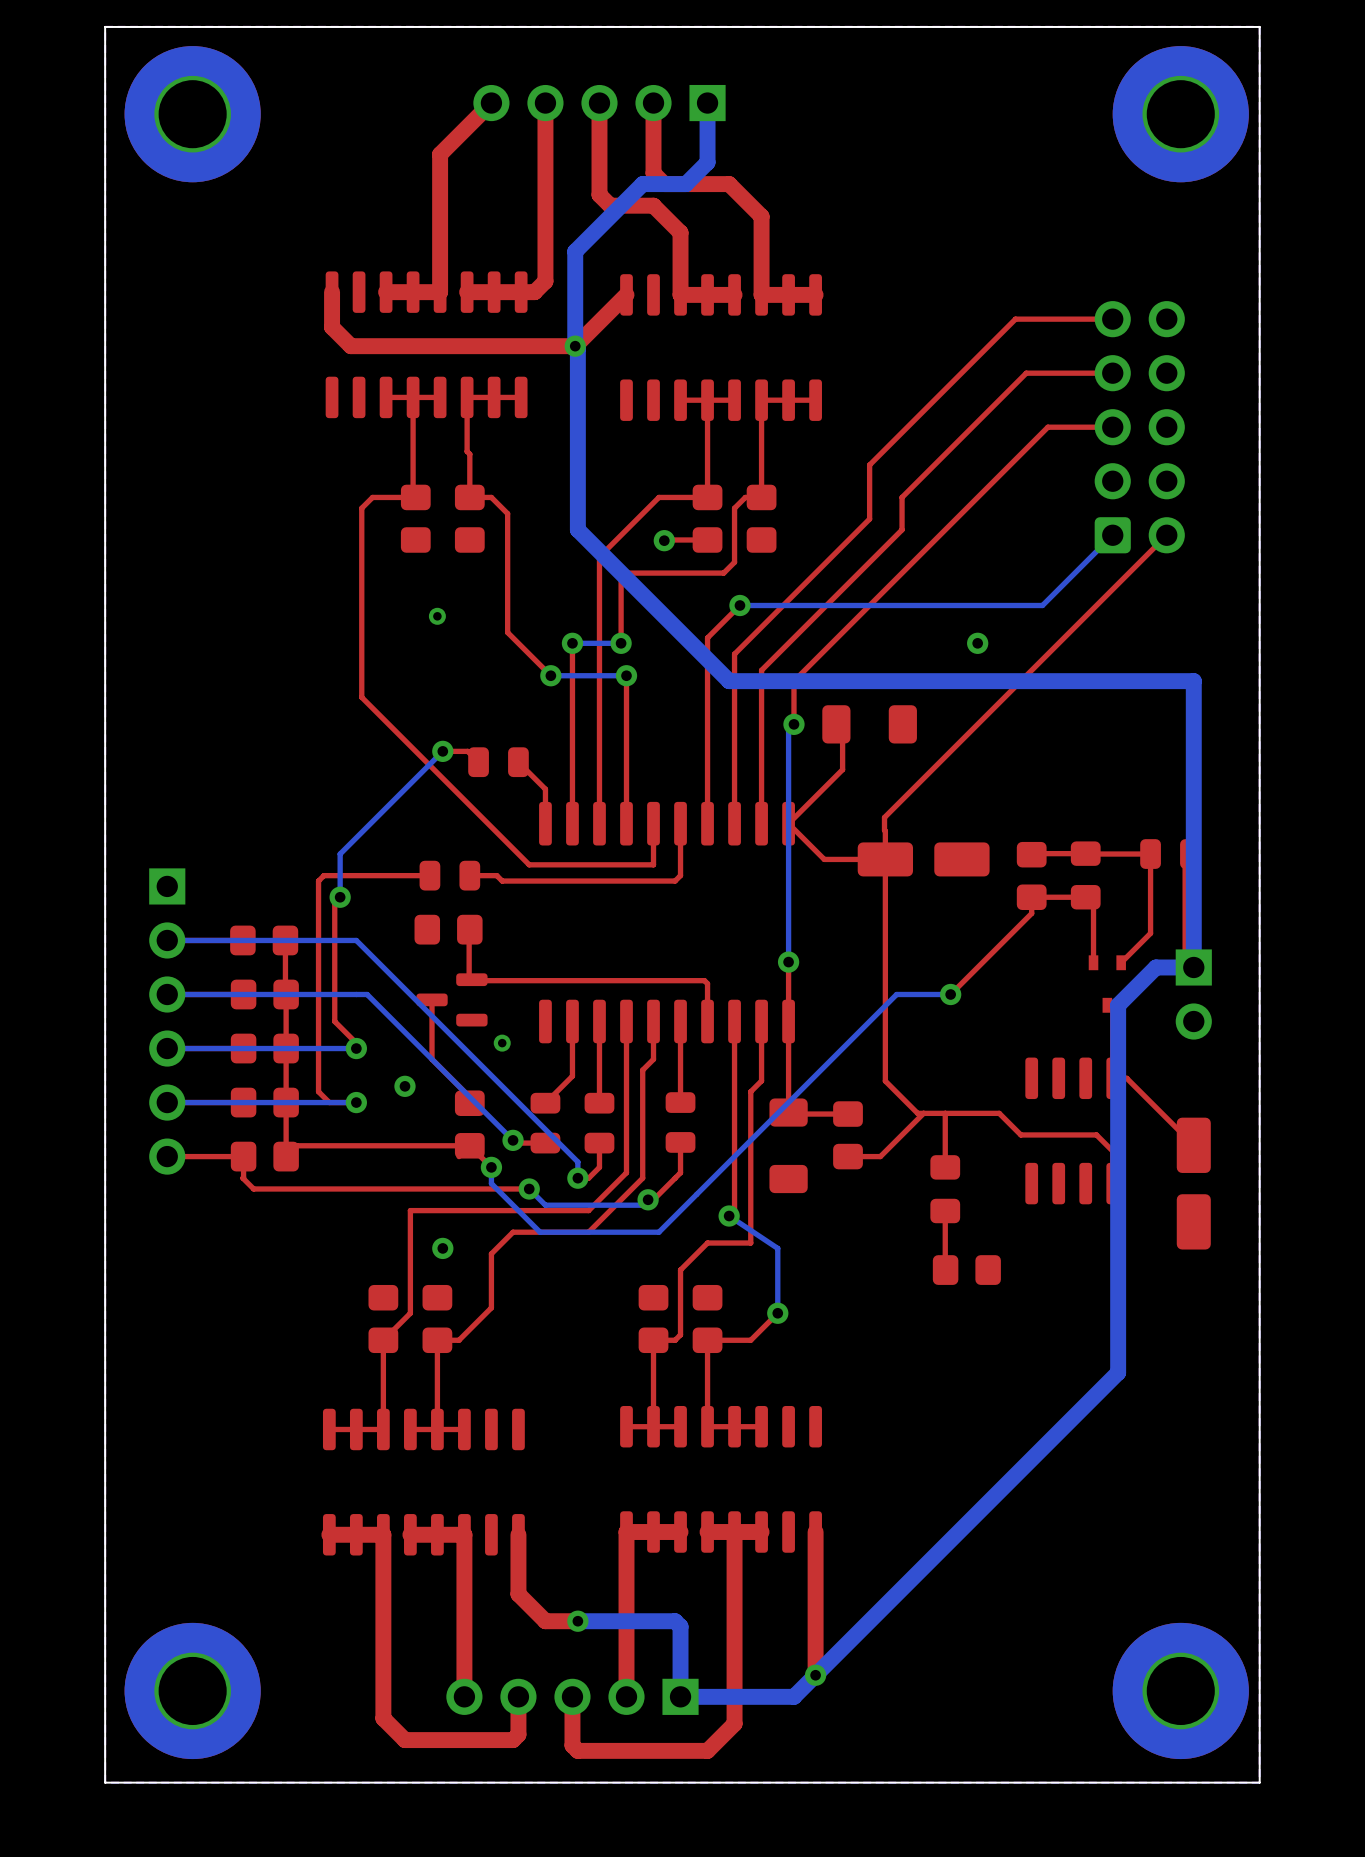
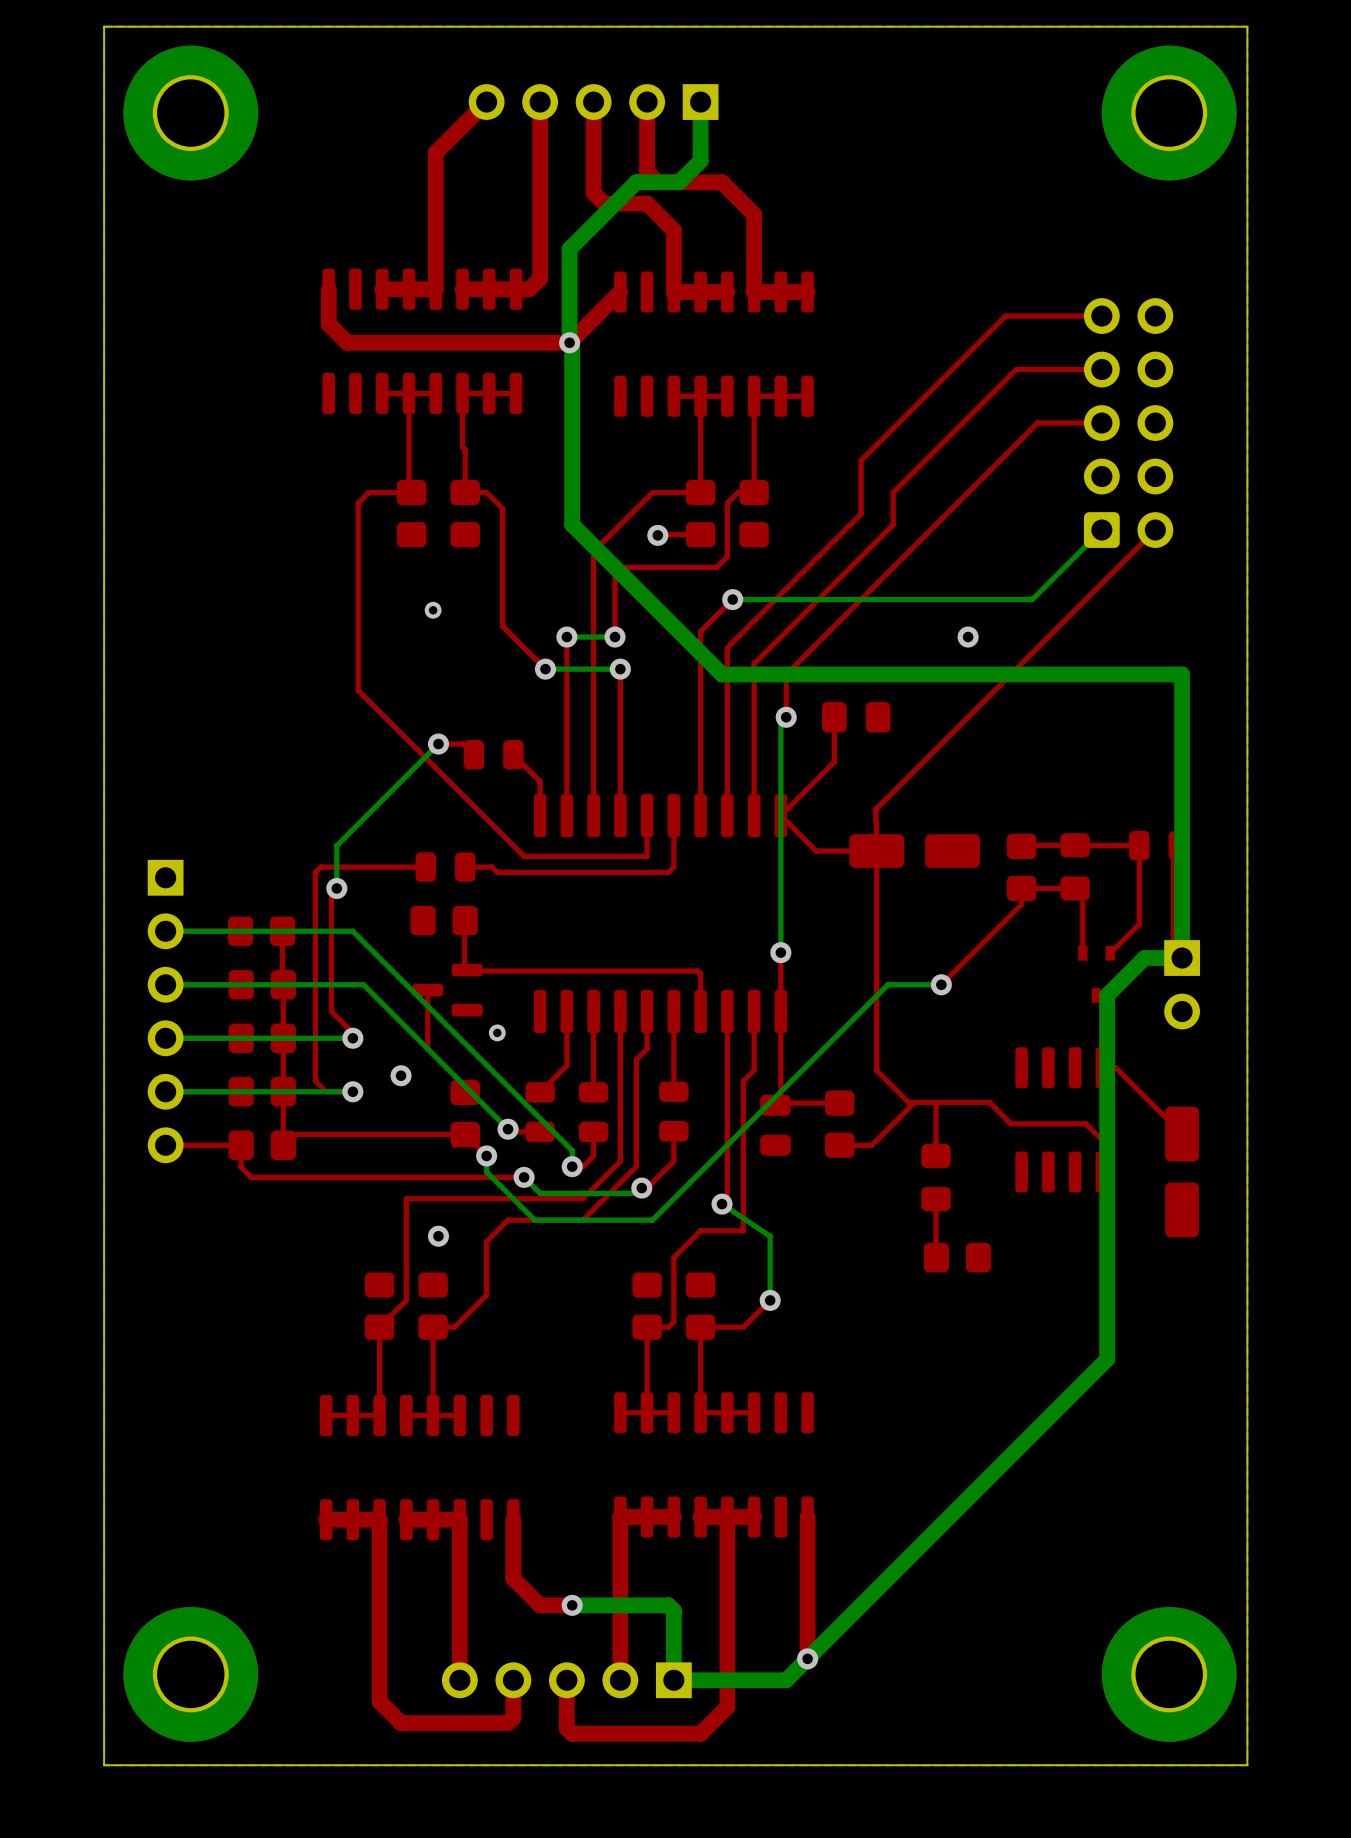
part footprint: [822, 705, 917, 744] -> [822, 702, 891, 733]
part footprint: [769, 1098, 808, 1194] -> [760, 1094, 791, 1156]

